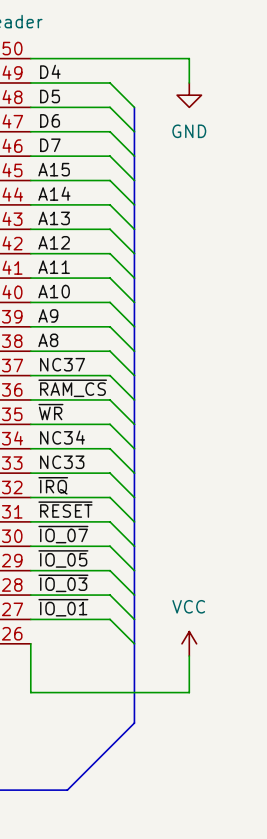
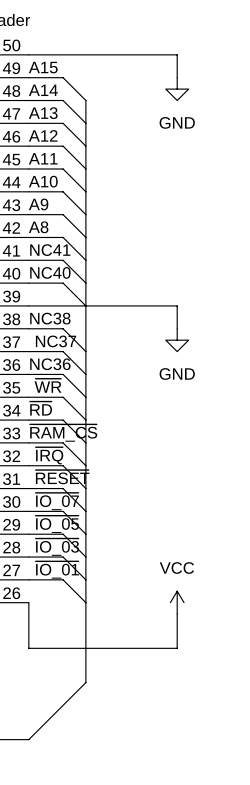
label: D4 (50, 71) -> none
wire: (67, 82) (110, 82) (134, 107) -> (63, 77) (85, 100)
label: D5 (50, 96) -> none
wire: (67, 107) (110, 107) (134, 131) -> (63, 100) (85, 123)
bus: (134, 107) (134, 723) (67, 790) (30, 790) -> (85, 100) (85, 682) (28, 739)
label: D6 (50, 120) -> none
wire: (67, 131) (110, 131) (134, 156) -> (63, 123) (85, 146)
label: D7 (50, 145) -> none
wire: (67, 156) (110, 156) (134, 180) -> (63, 146) (85, 168)
label position: A15 (54, 169) -> A15 (43, 67)
wire: (67, 180) (110, 180) (134, 204) -> (63, 168) (85, 191)
label position: A14 (54, 193) -> A14 (43, 90)
wire: (67, 204) (110, 204) (134, 229) -> (63, 191) (85, 214)
label position: A13 (54, 218) -> A13 (43, 113)
wire: (67, 229) (110, 229) (134, 253) -> (63, 214) (85, 237)
label position: A12 (54, 242) -> A12 (43, 135)
wire: (67, 253) (110, 253) (134, 278) -> (63, 237) (85, 260)
label: none -> NC41 (50, 250)
label position: A11 (54, 267) -> A11 (43, 158)
wire: (67, 278) (110, 278) (134, 302) -> (63, 260) (85, 283)
label position: A10 (54, 291) -> A10 (43, 181)
label: none -> NC40 (50, 272)
wire: (67, 302) (110, 302) (134, 326) -> (63, 283) (85, 305)
label position: A9 (48, 315) -> A9 (38, 204)
wire: (110, 326) (134, 351) -> (103, 305) (177, 305) (177, 328)
label position: A8 (48, 340) -> A8 (38, 227)
label: none -> NC38 (50, 318)
wire: (67, 351) (110, 351) (134, 375) -> (63, 328) (85, 351)
power symbol: none -> GND (177, 340)
wire: (67, 375) (110, 375) (134, 399) -> (63, 351) (85, 374)
label position: ~{RAM_CS} (72, 388) -> ~{RAM_CS} (63, 433)
label: none -> NC36 (50, 364)
wire: (67, 399) (110, 399) (134, 424) -> (63, 374) (85, 397)
wire: (67, 424) (110, 424) (134, 448) -> (63, 397) (85, 420)
label: NC34 (62, 437) -> ~{RD} (40, 408)
wire: (67, 448) (110, 448) (134, 473) -> (63, 420) (85, 442)
label: NC33 (62, 462) -> none
wire: (67, 473) (110, 473) (134, 497) -> (63, 442) (85, 465)
wire: (67, 497) (110, 497) (134, 521) -> (63, 465) (85, 488)
wire: (67, 521) (110, 521) (134, 546) -> (63, 488) (85, 511)
wire: (67, 546) (110, 546) (134, 570) -> (63, 511) (85, 534)
wire: (67, 570) (110, 570) (134, 595) -> (63, 534) (85, 557)
wire: (67, 595) (110, 595) (134, 619) -> (63, 557) (85, 579)
wire: (67, 619) (110, 619) (134, 643) -> (63, 579) (85, 602)

